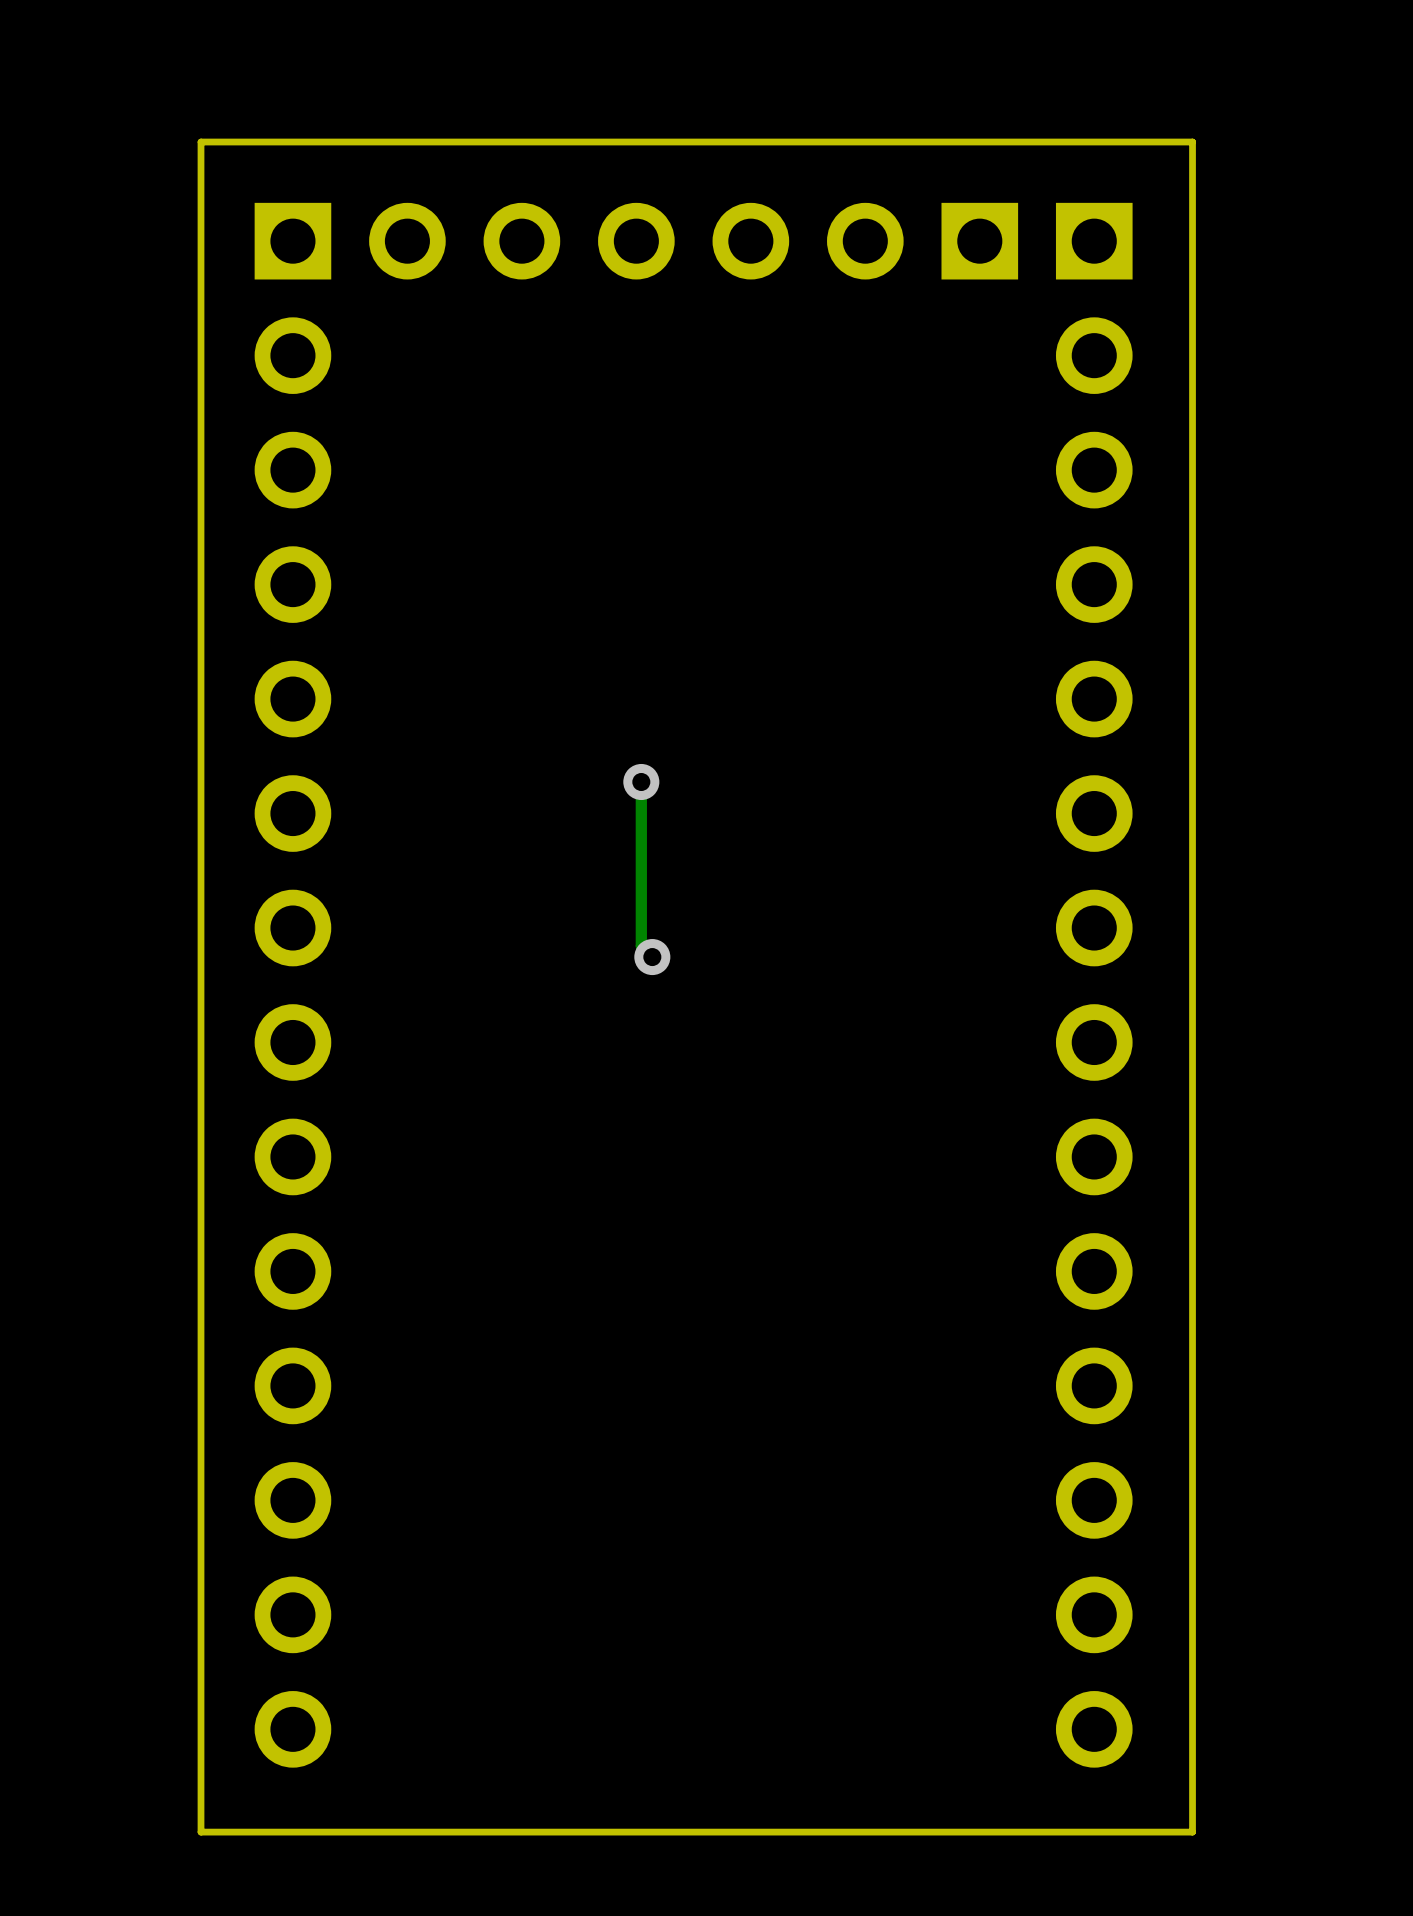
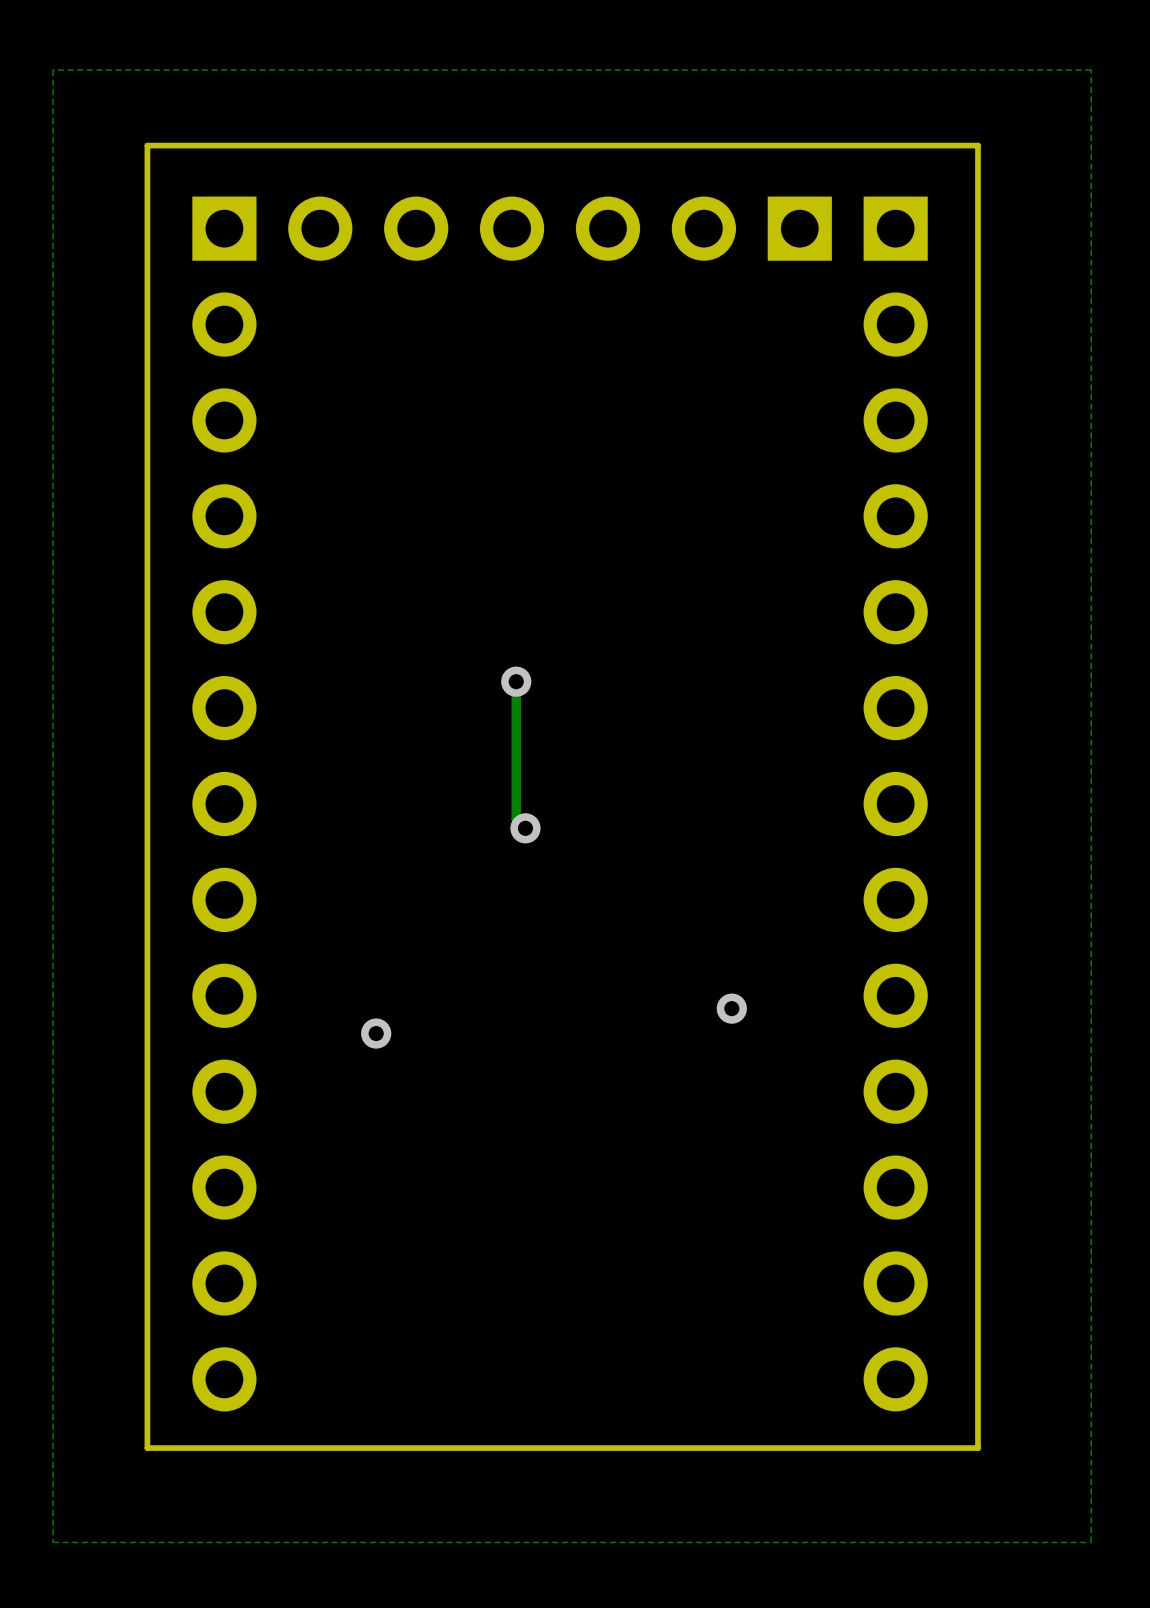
zone outline: none -> (1091, 70) (53, 70) (53, 1542) (1091, 1542) (1091, 70)
part: (292, 985) -> none
part: (1094, 985) -> none
via: none -> (731, 1008)
via: none -> (376, 1033)
board edge: (1192, 1696) (1192, 1832) (201, 1832) (201, 1696) -> (977, 1448) (147, 1448)

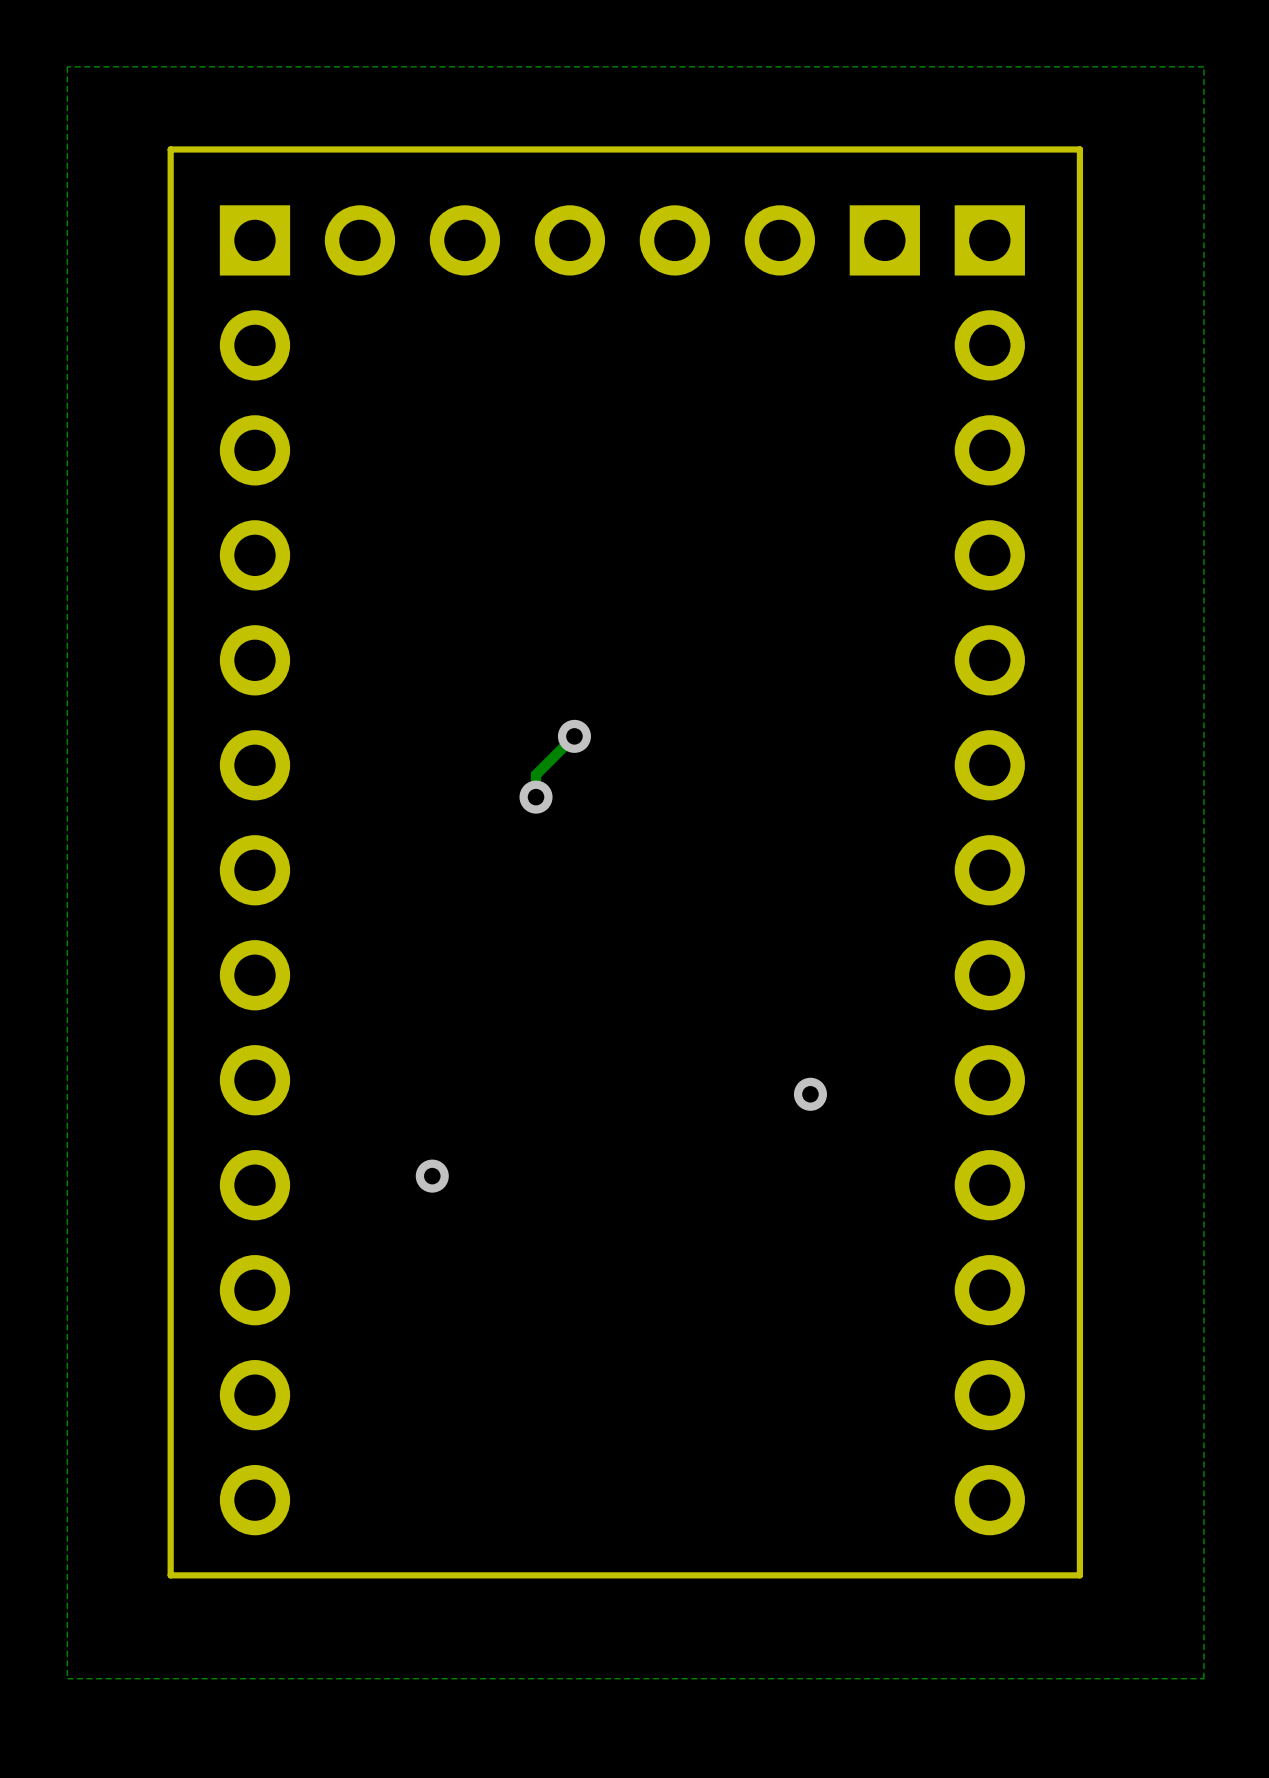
track: (516, 681) (516, 819) (525, 828) -> (574, 736) (536, 774) (536, 797)
via position: (525, 828) -> (536, 797)
via position: (376, 1033) -> (432, 1176)

